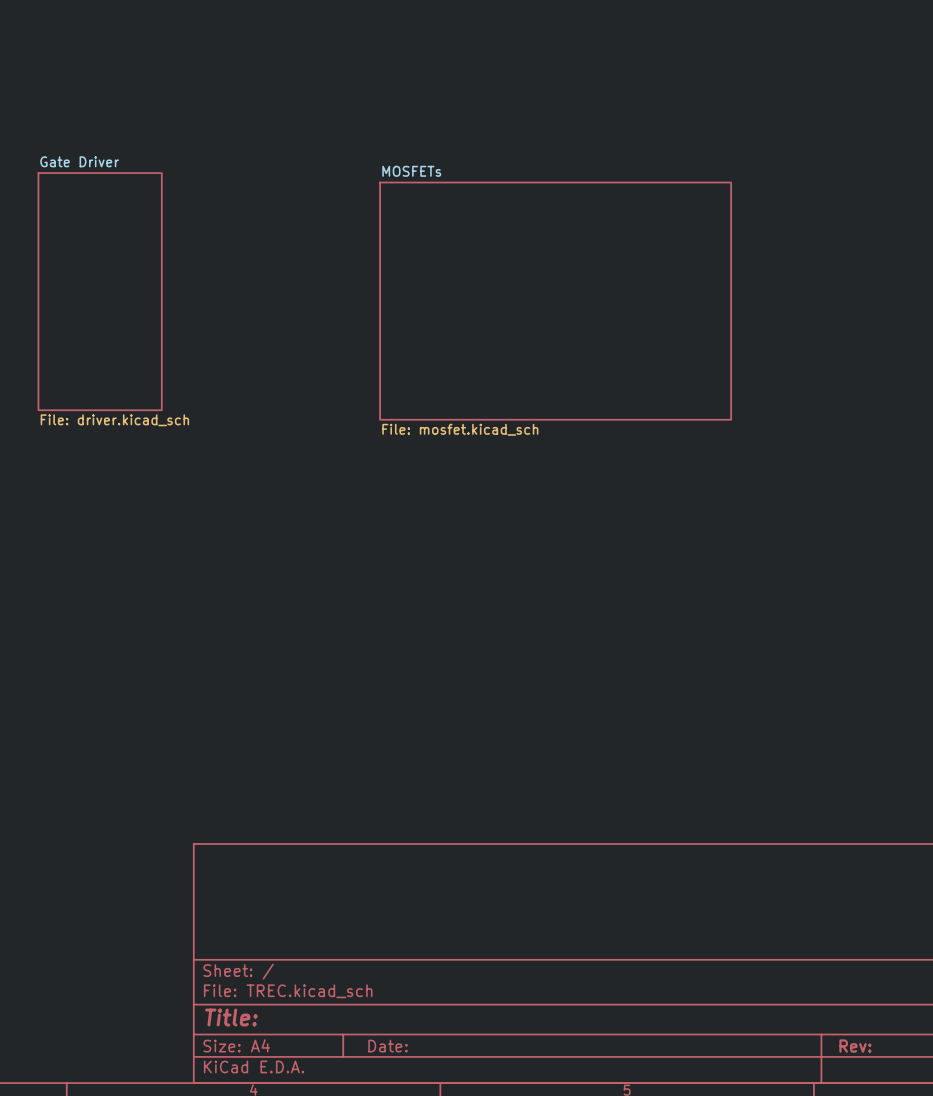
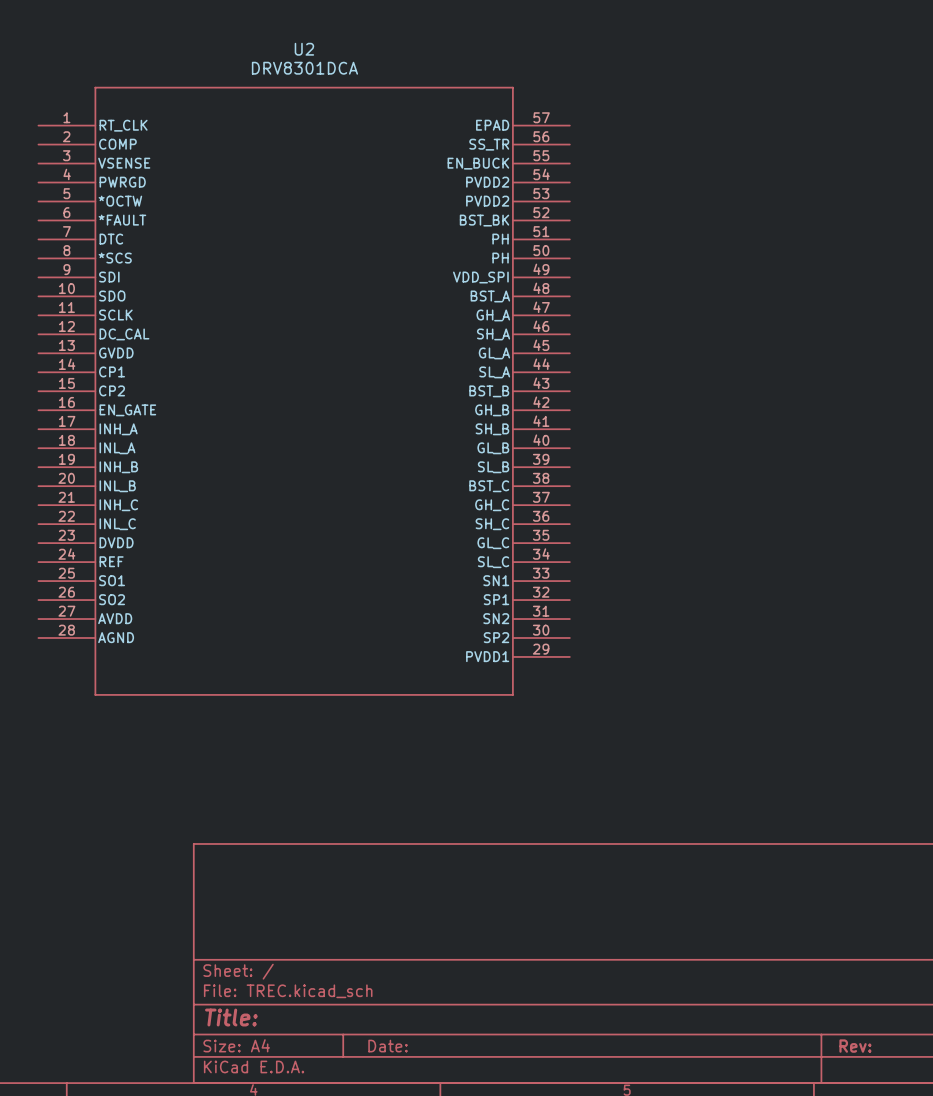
sheet Gate Driver: File: driver.kicad_sch (100, 291) -> none
sheet MOSFETs: File: mosfet.kicad_sch (555, 301) -> none
U2: none -> DRV8301DCA (304, 391)

